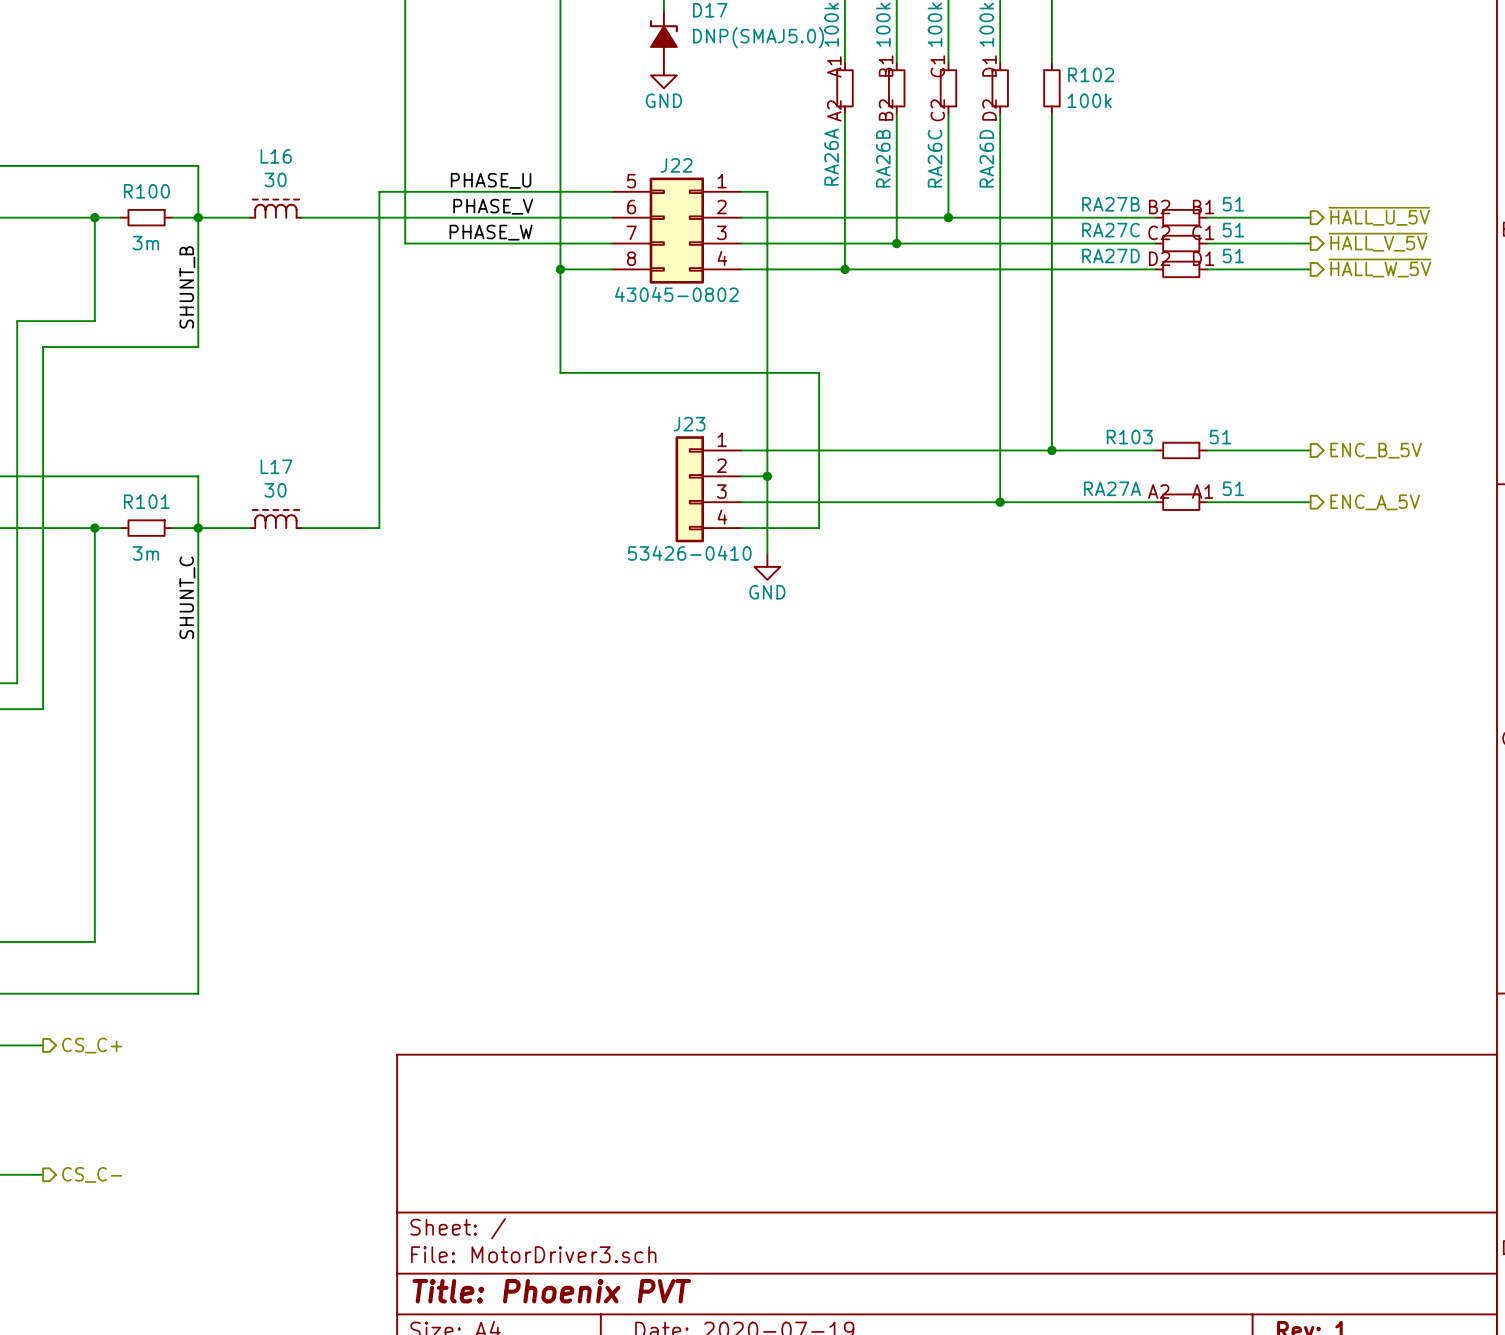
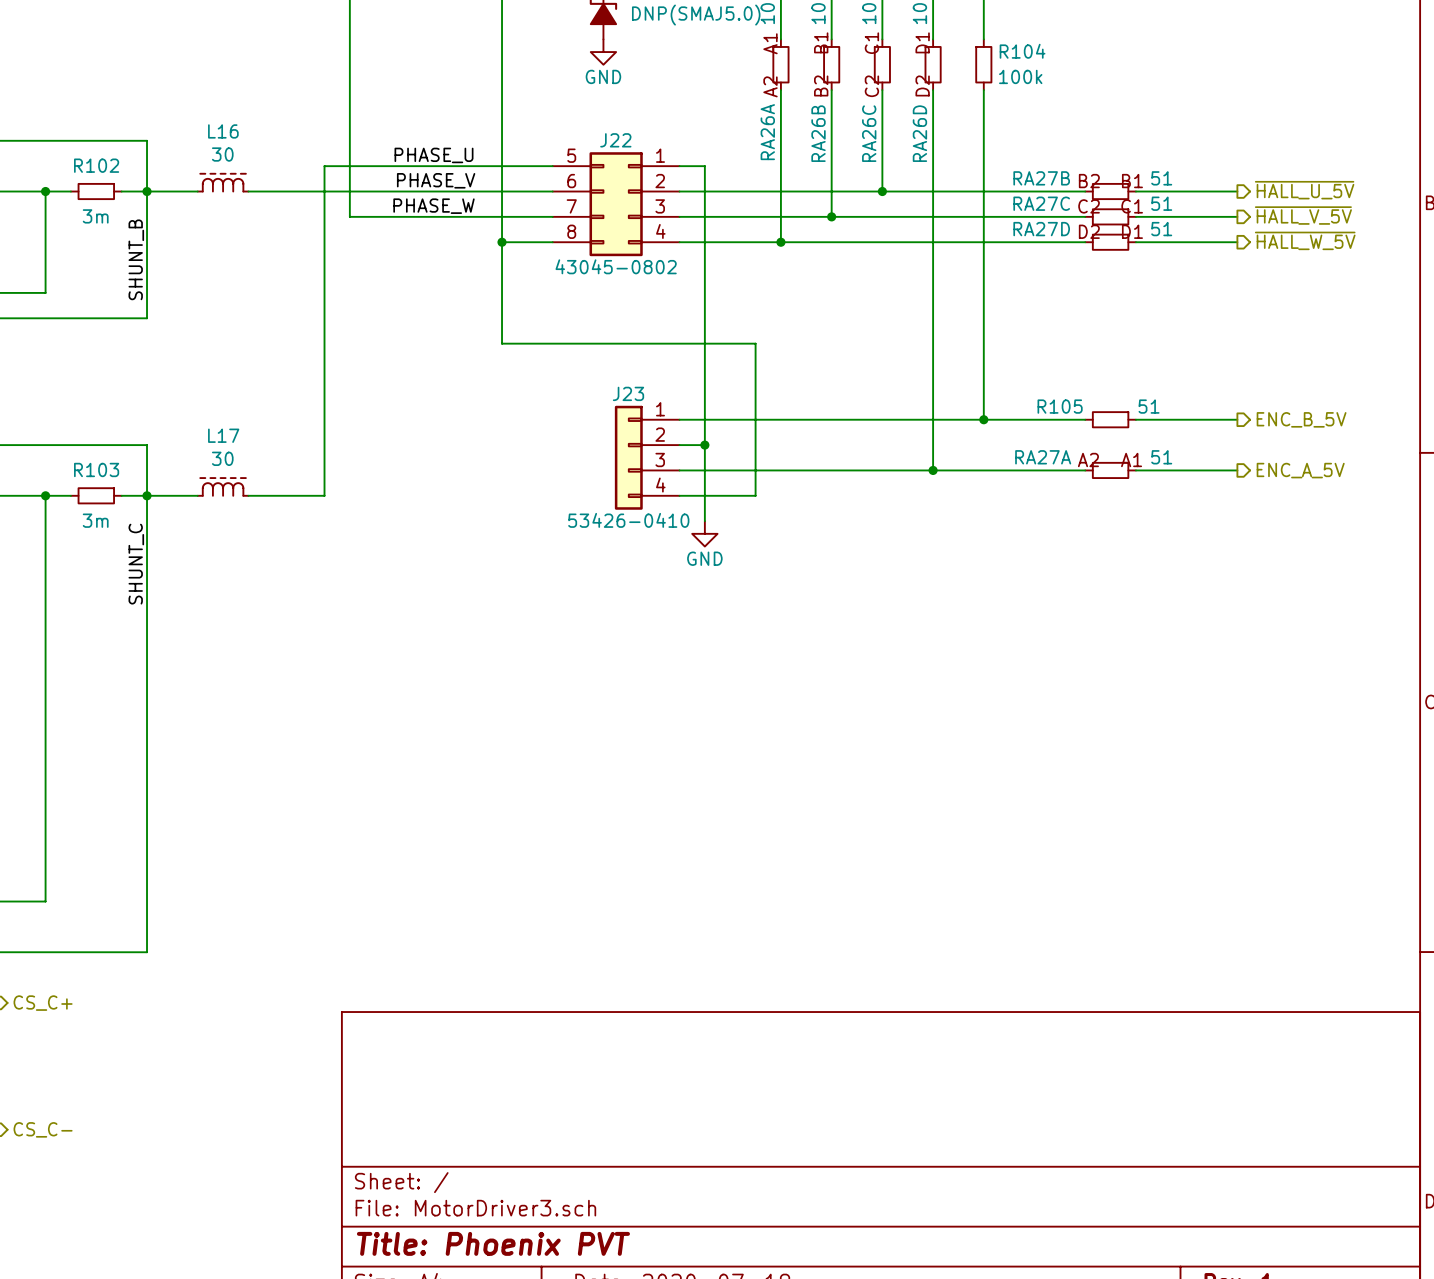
R102 name: R102 (1091, 74) -> R104 (1022, 51)
R100 name: R100 (146, 191) -> R102 (96, 165)
R103 name: R103 (1129, 437) -> R105 (1060, 406)
R101 name: R101 (146, 501) -> R103 (96, 469)

